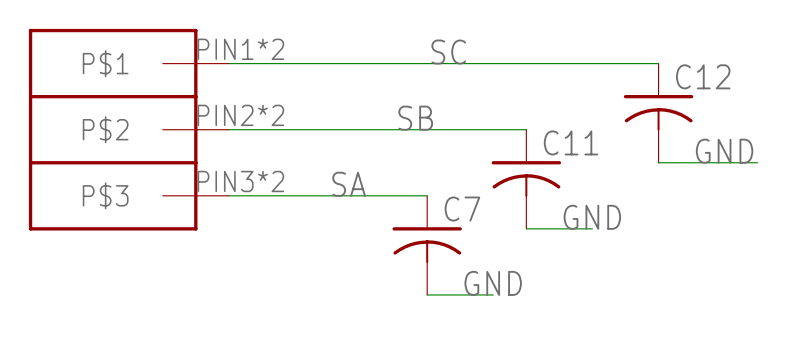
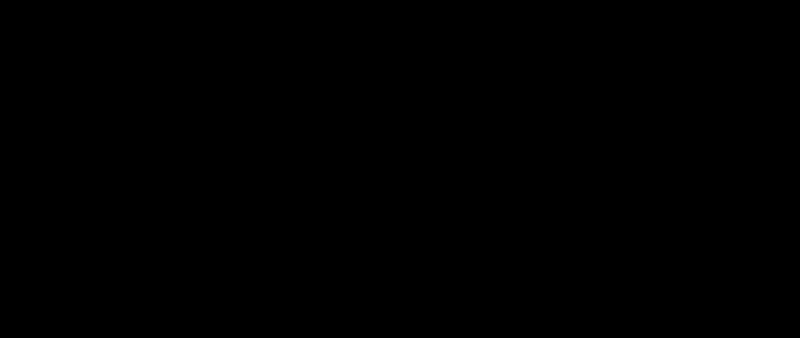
label: SC (448, 52) -> none
wire: (228, 63) (658, 63) -> none
C12: (658, 113) -> none
label: SB (415, 118) -> none
part: (128, 129) -> none
wire: (228, 129) (526, 129) -> none
label: GND (724, 151) -> none
wire: (658, 162) (757, 162) -> none
C11: (526, 179) -> none
label: SA (349, 184) -> none
wire: (228, 195) (427, 195) -> none
label: GND (592, 217) -> none
wire: (526, 228) (592, 228) -> none
C7: (427, 245) -> none
label: GND (493, 283) -> none
wire: (427, 294) (493, 294) -> none

